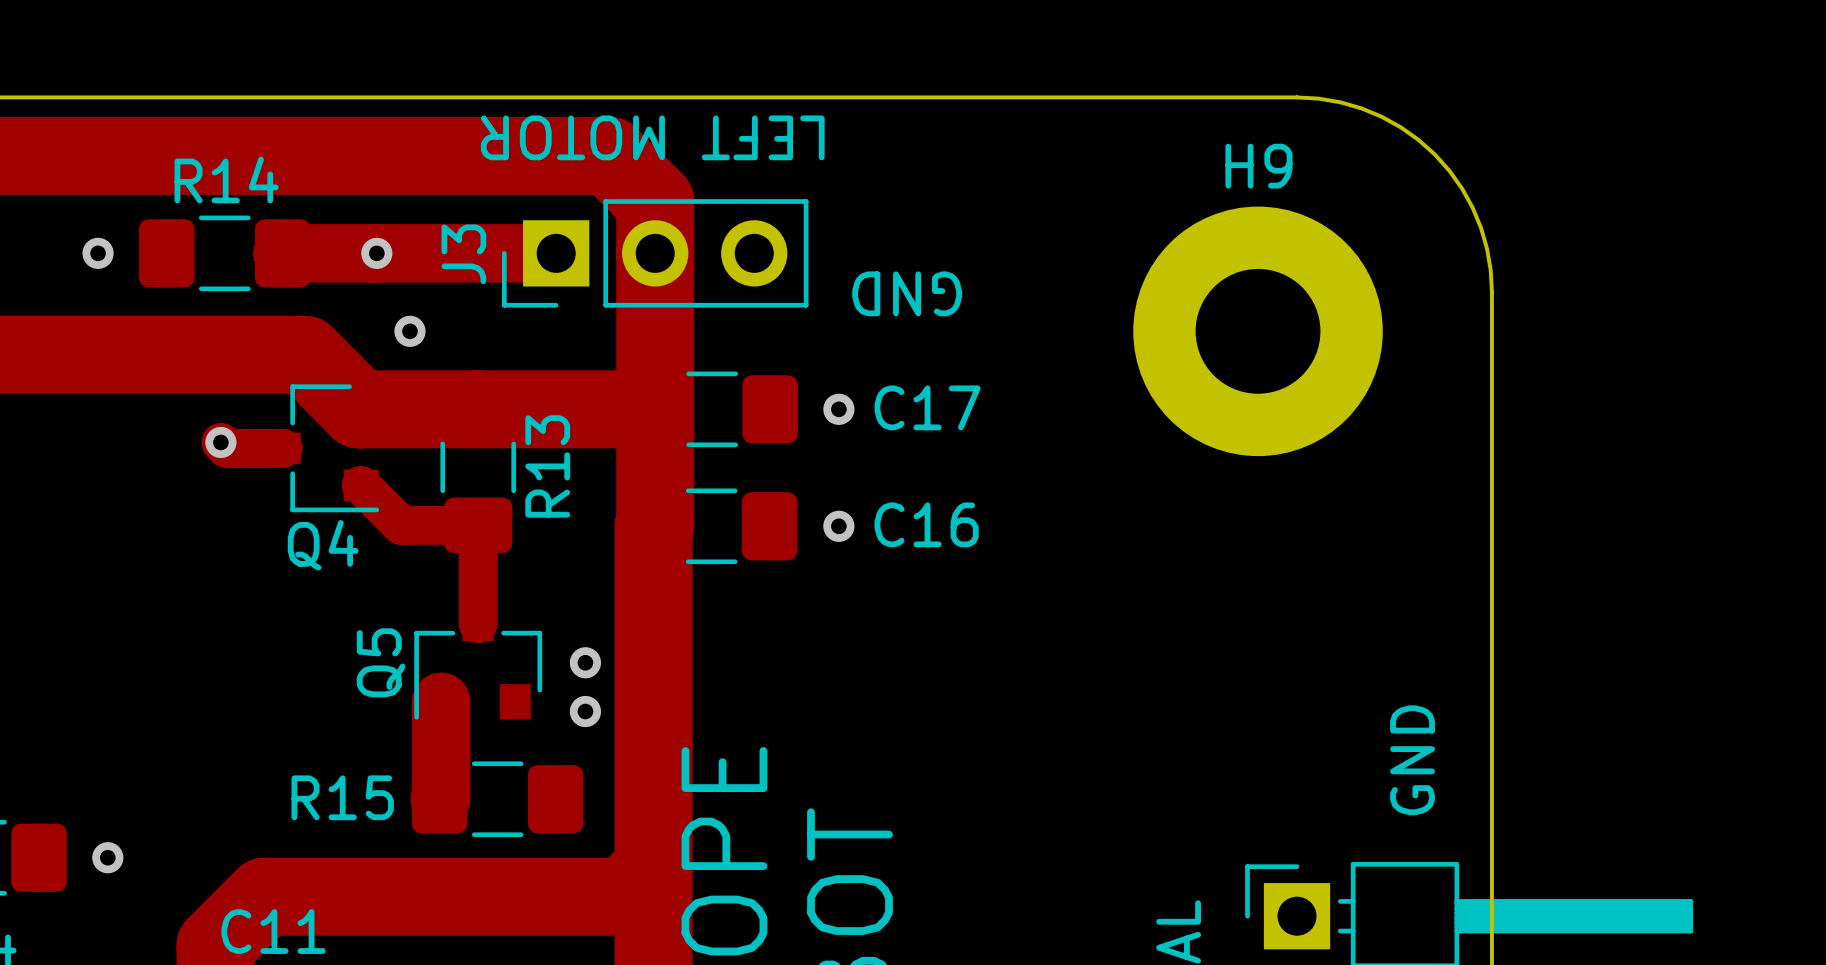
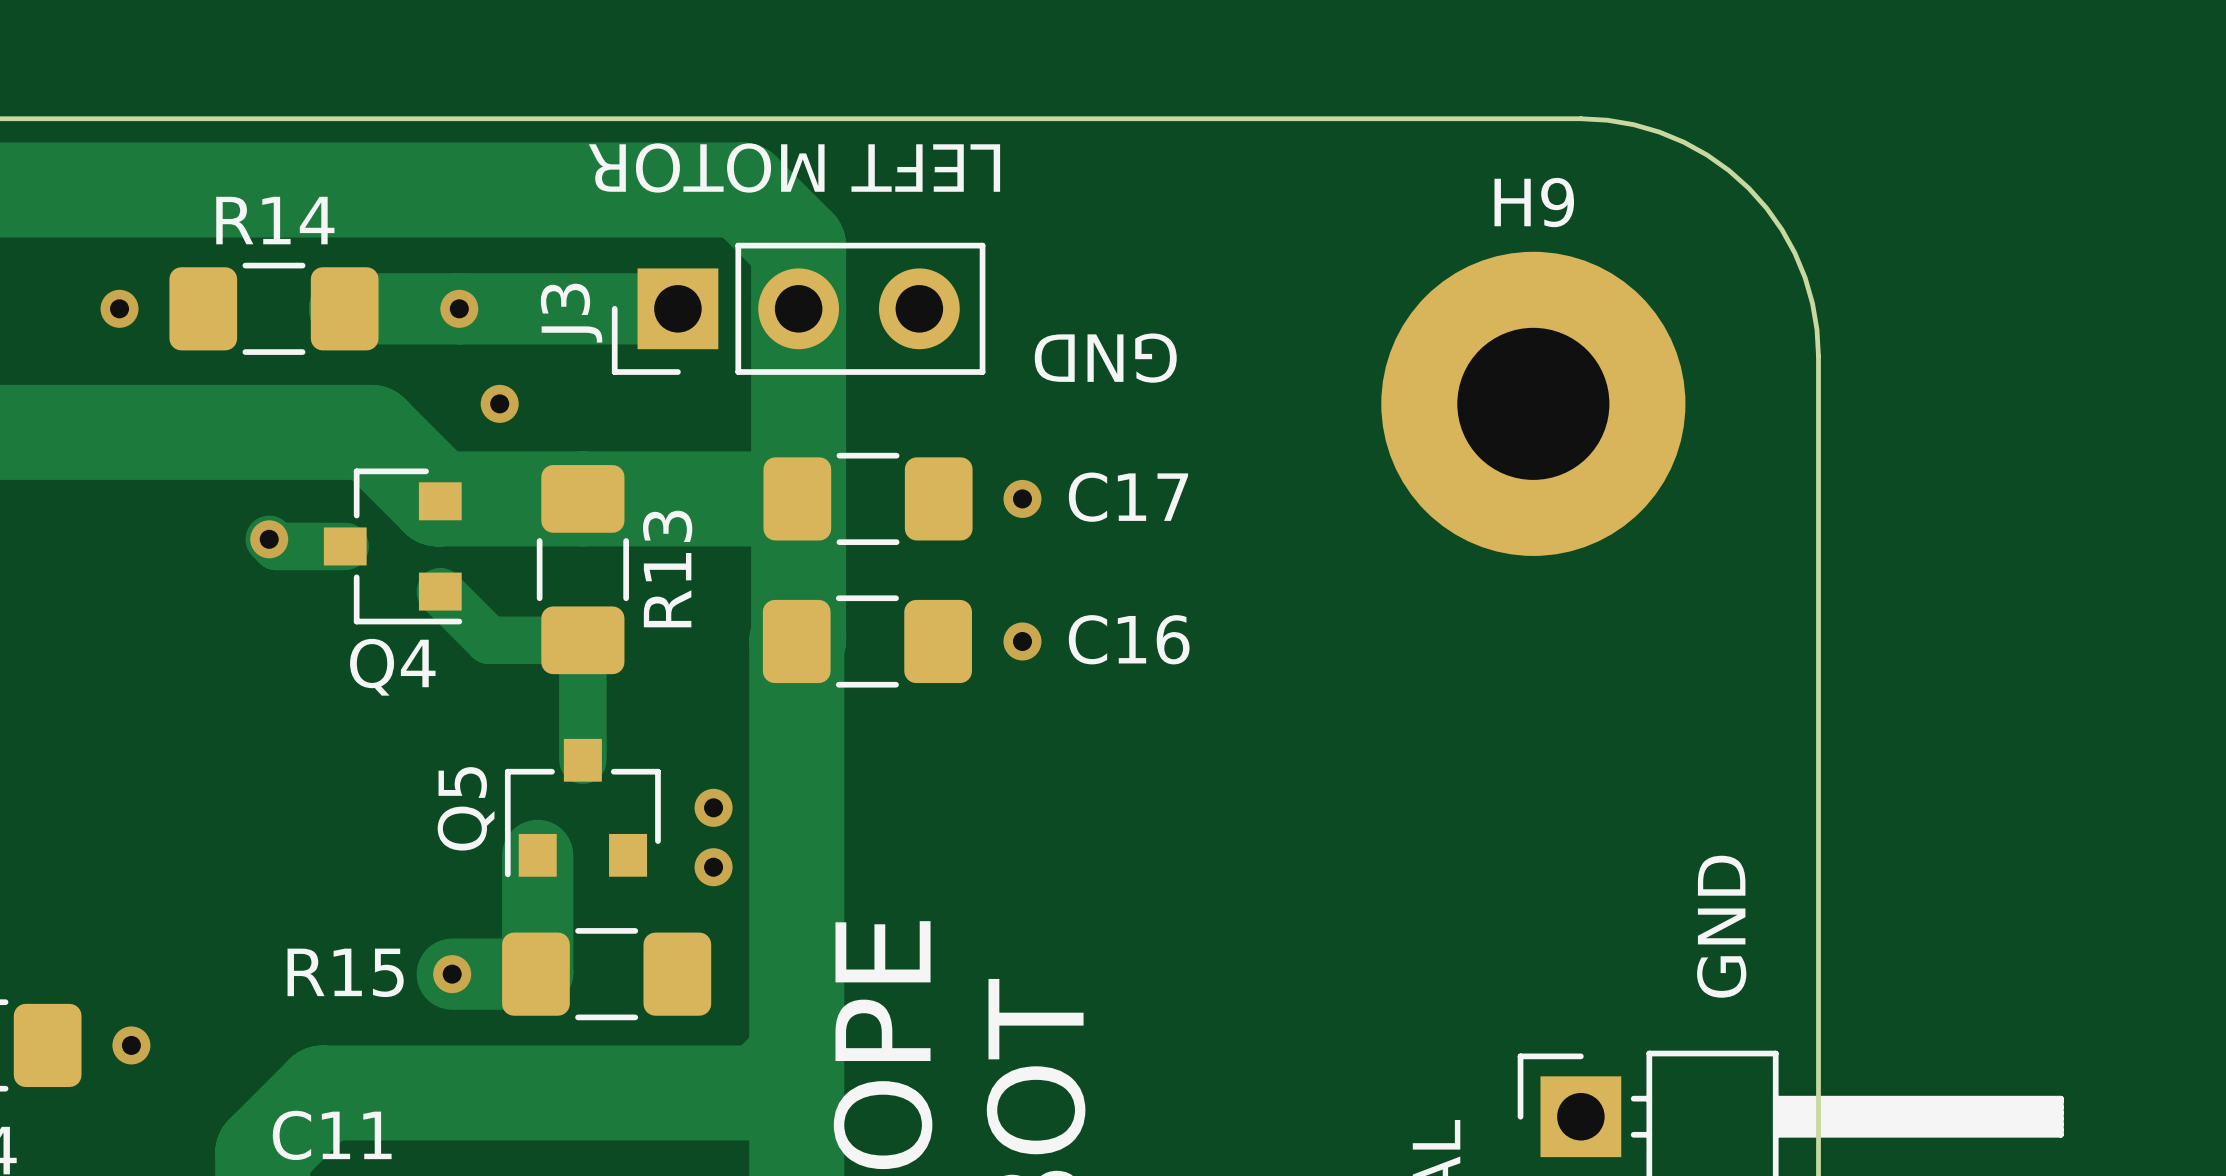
R15 name position: R15 (342, 797) -> R15 (345, 972)
track: none -> (452, 974) (535, 974)
via: none -> (452, 974)

